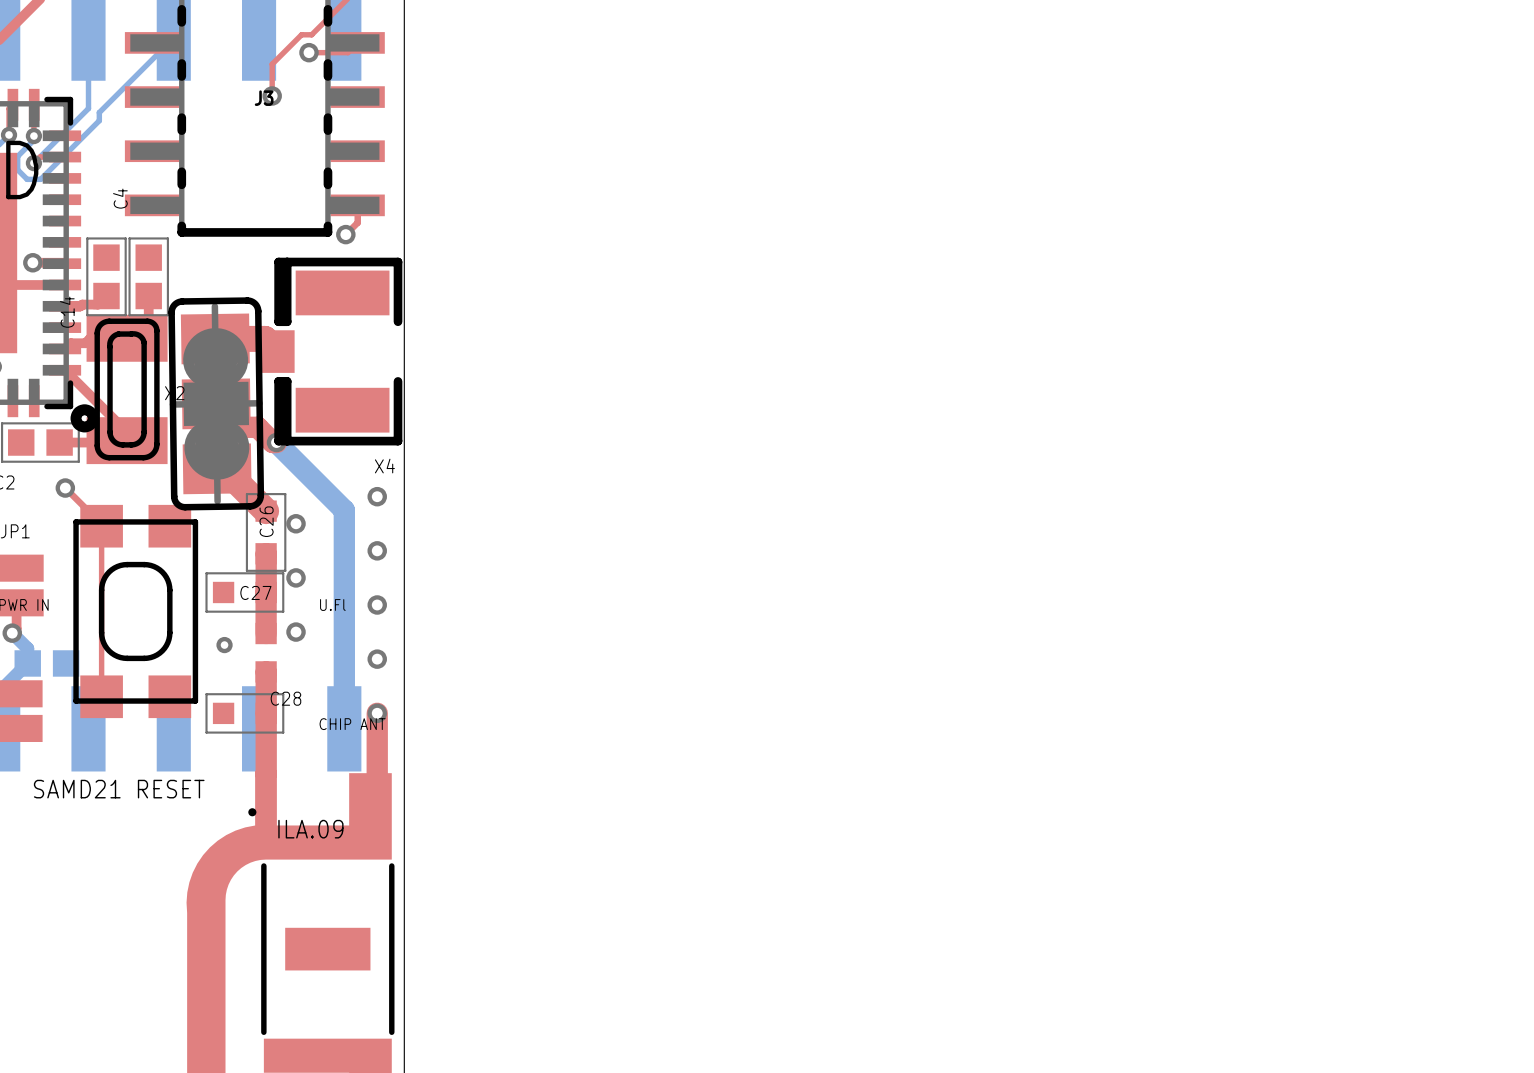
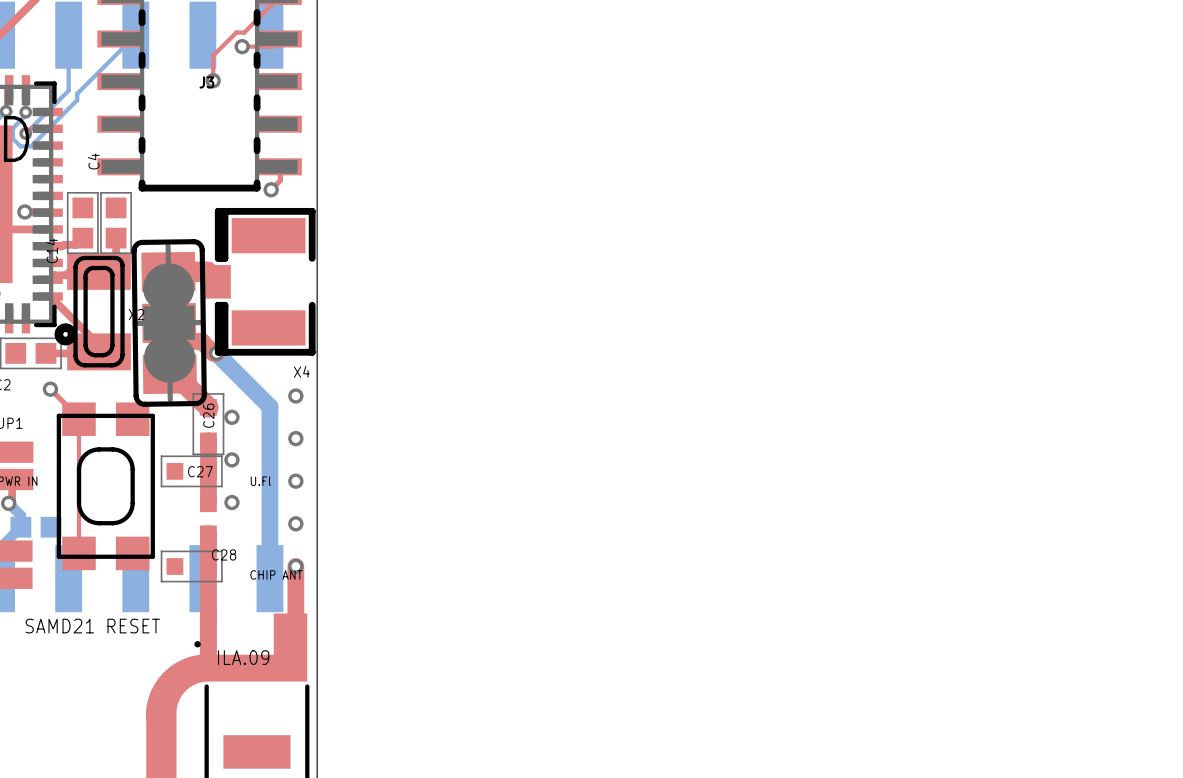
via: (224, 645) -> none

